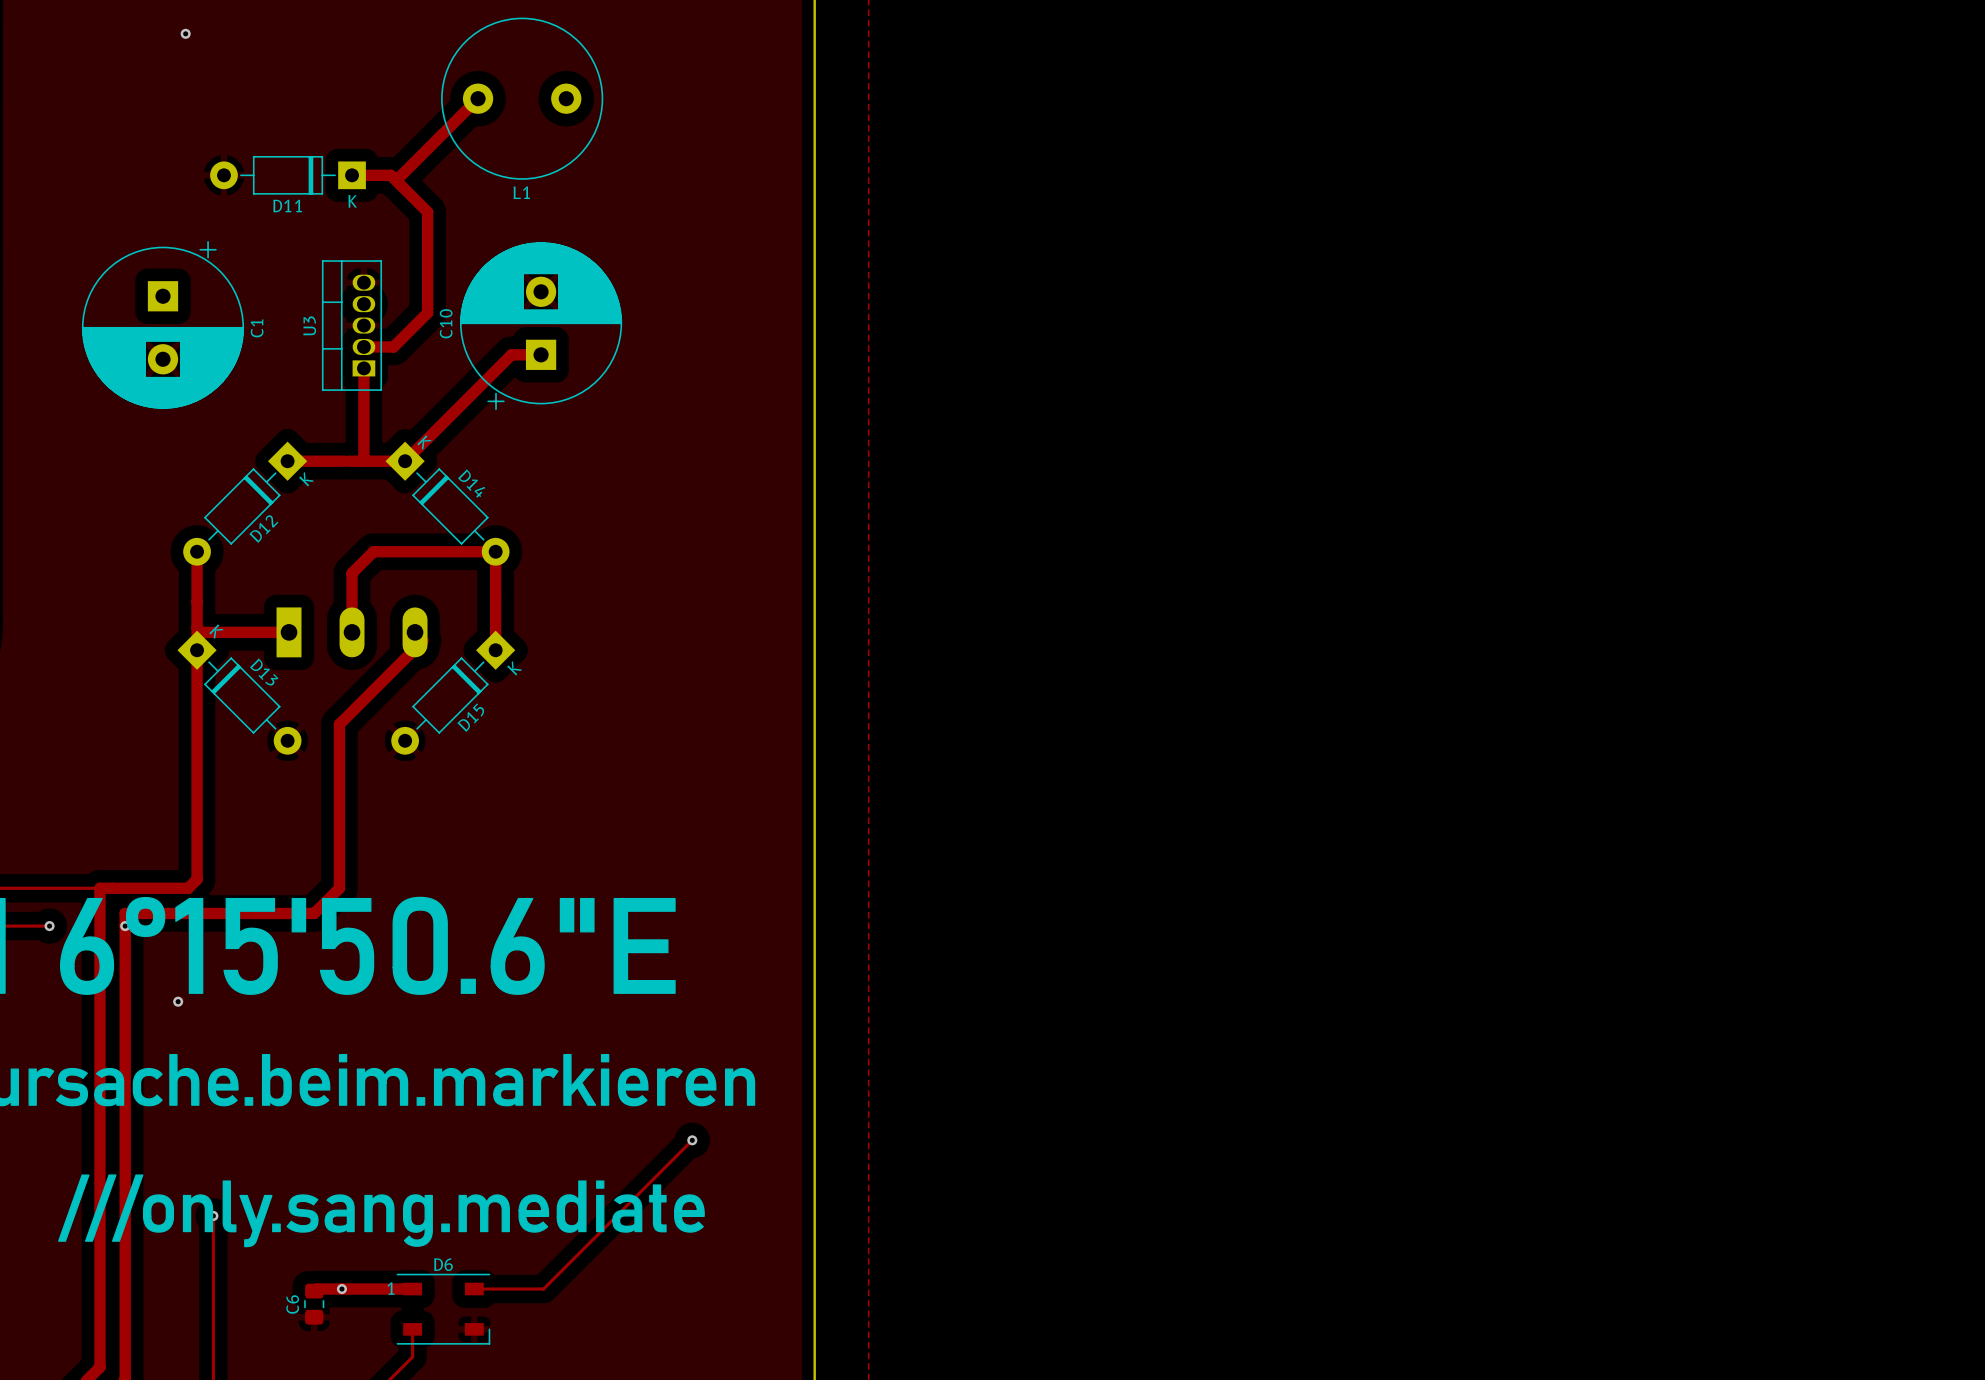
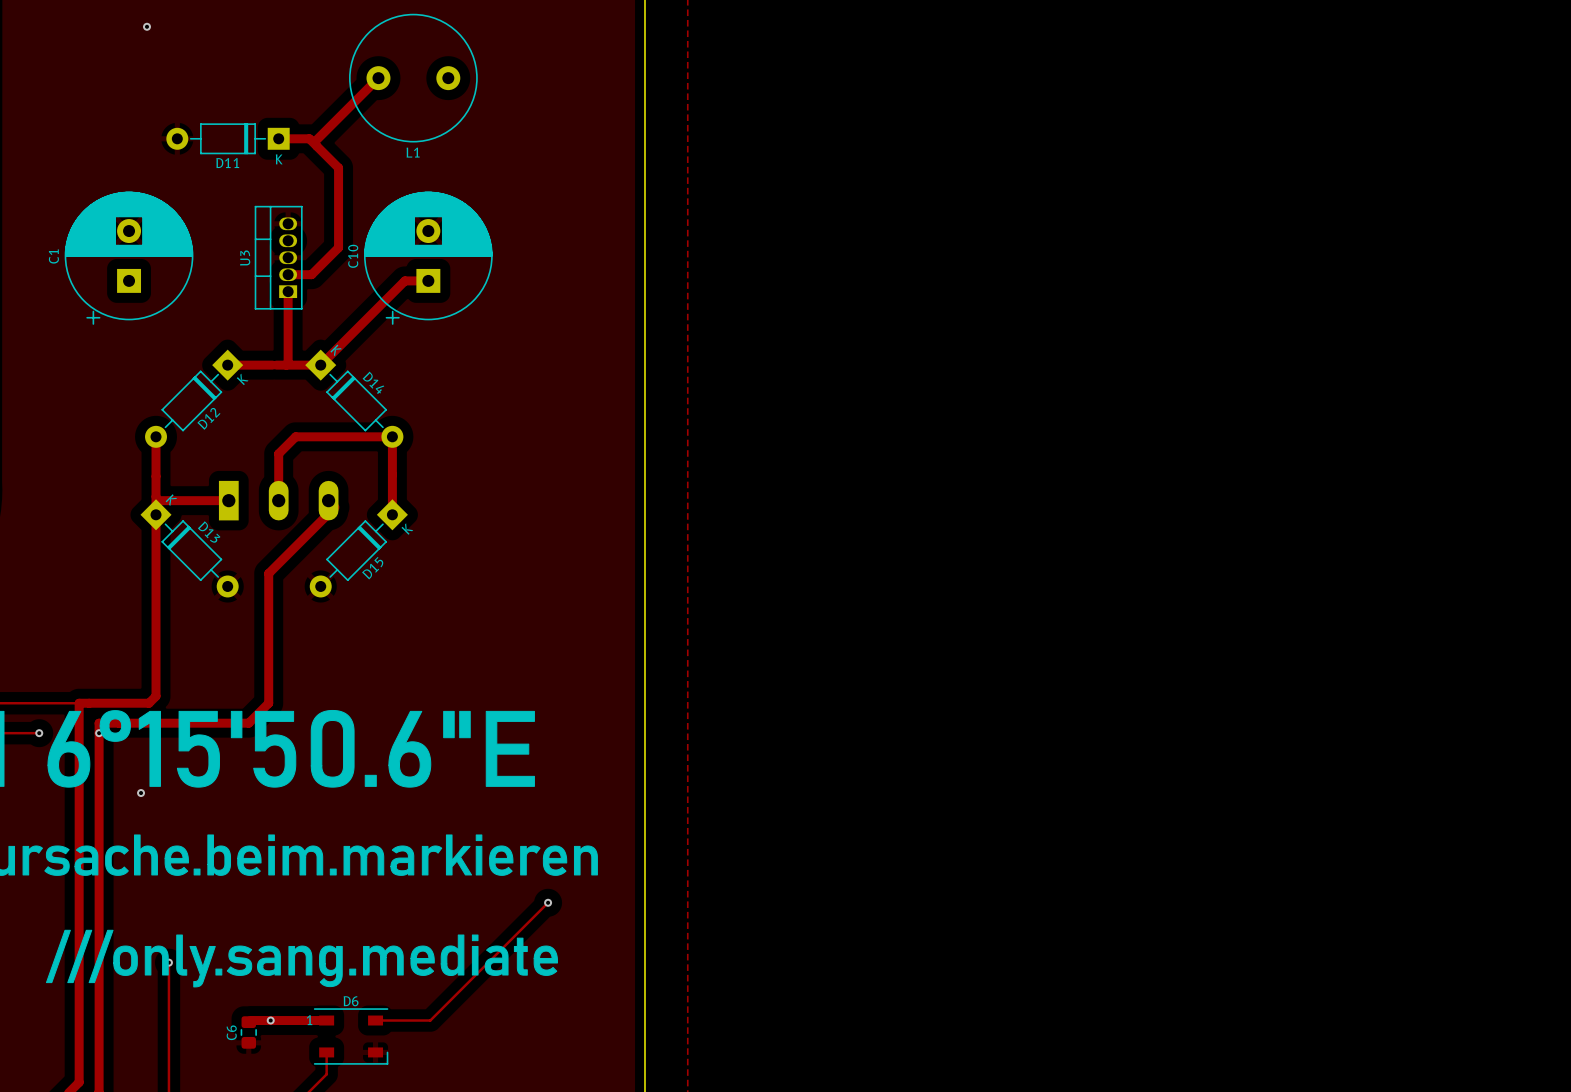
C1 rotation: 0° (162, 324) -> 180° (129, 258)

